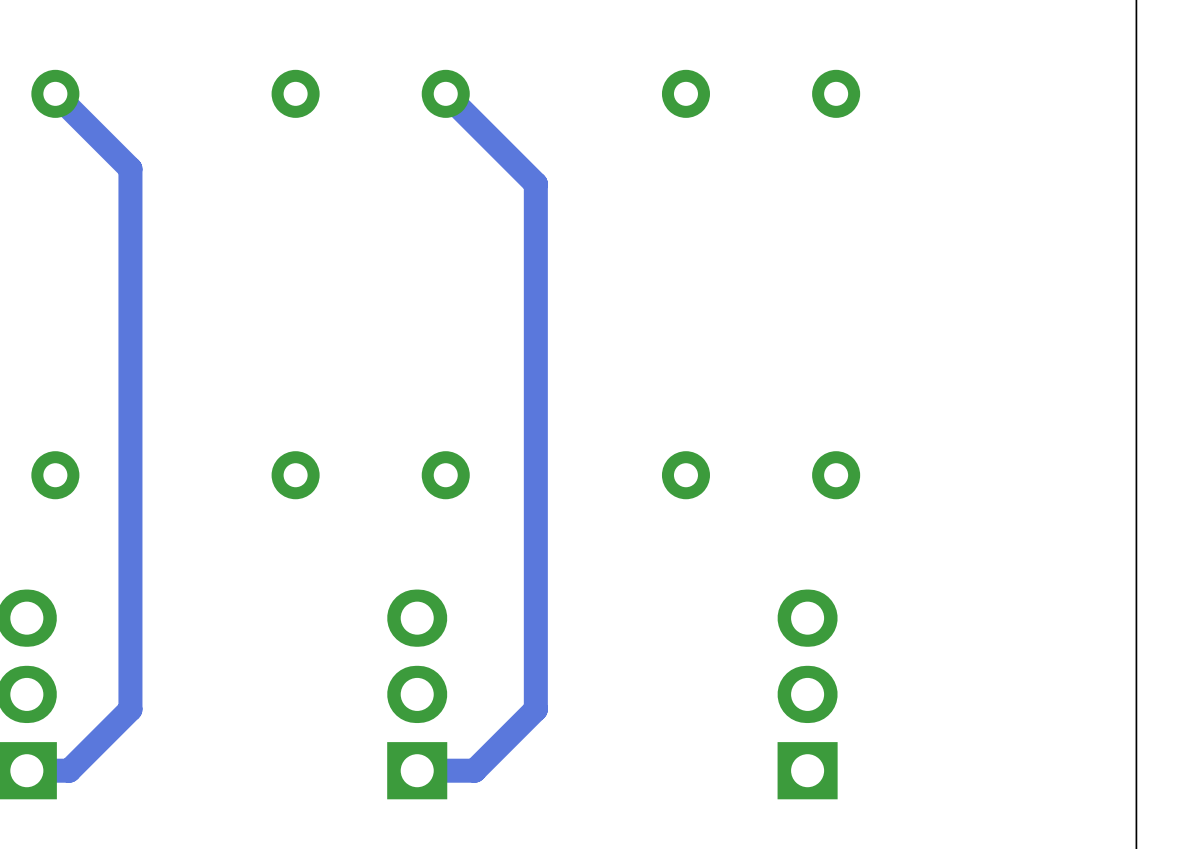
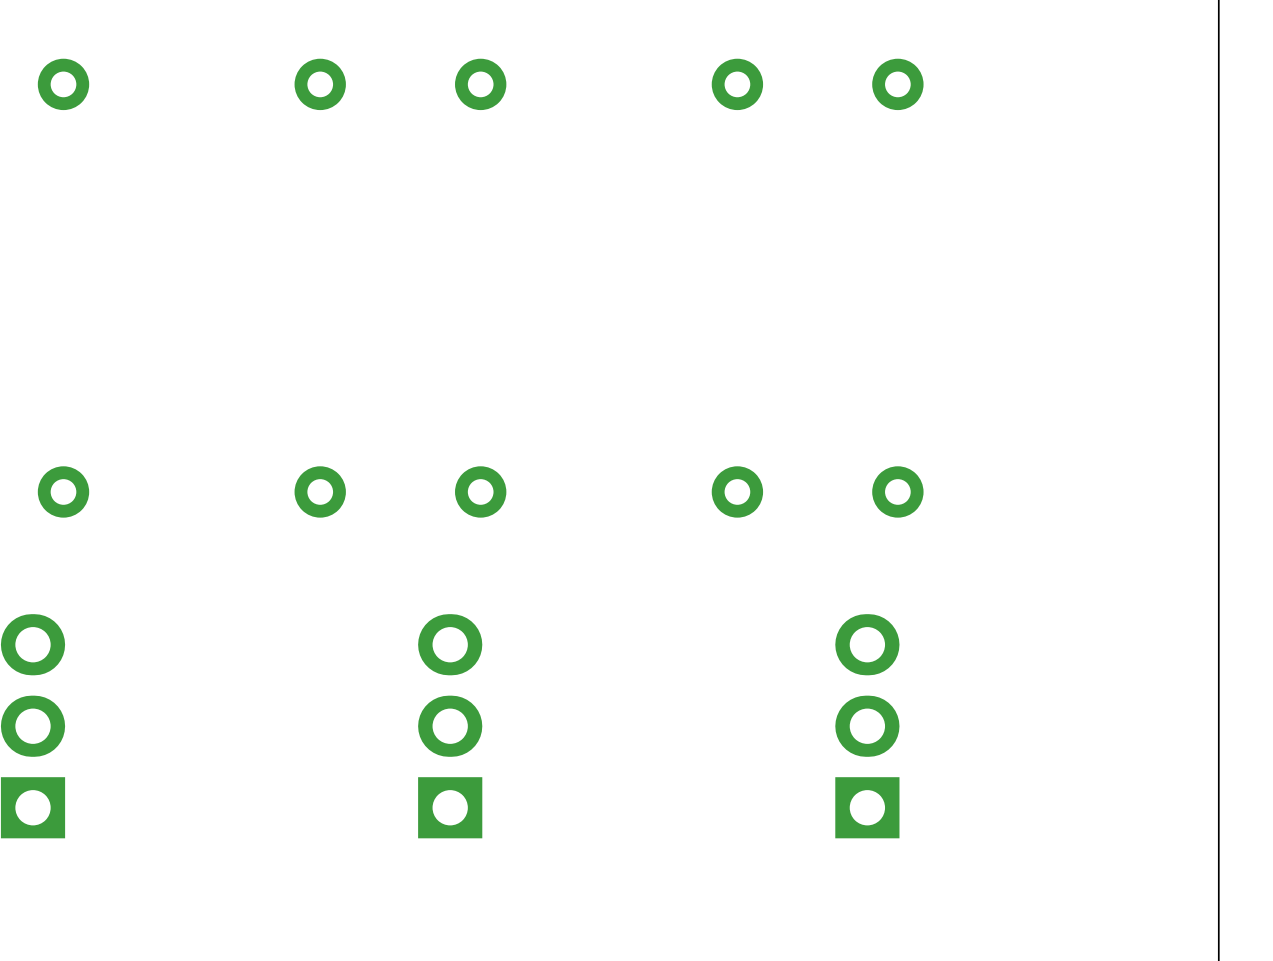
track: (55, 93) (130, 168) (130, 709) (69, 770) (26, 770) -> none
track: (445, 93) (535, 183) (535, 709) (474, 770) (417, 770) -> none

